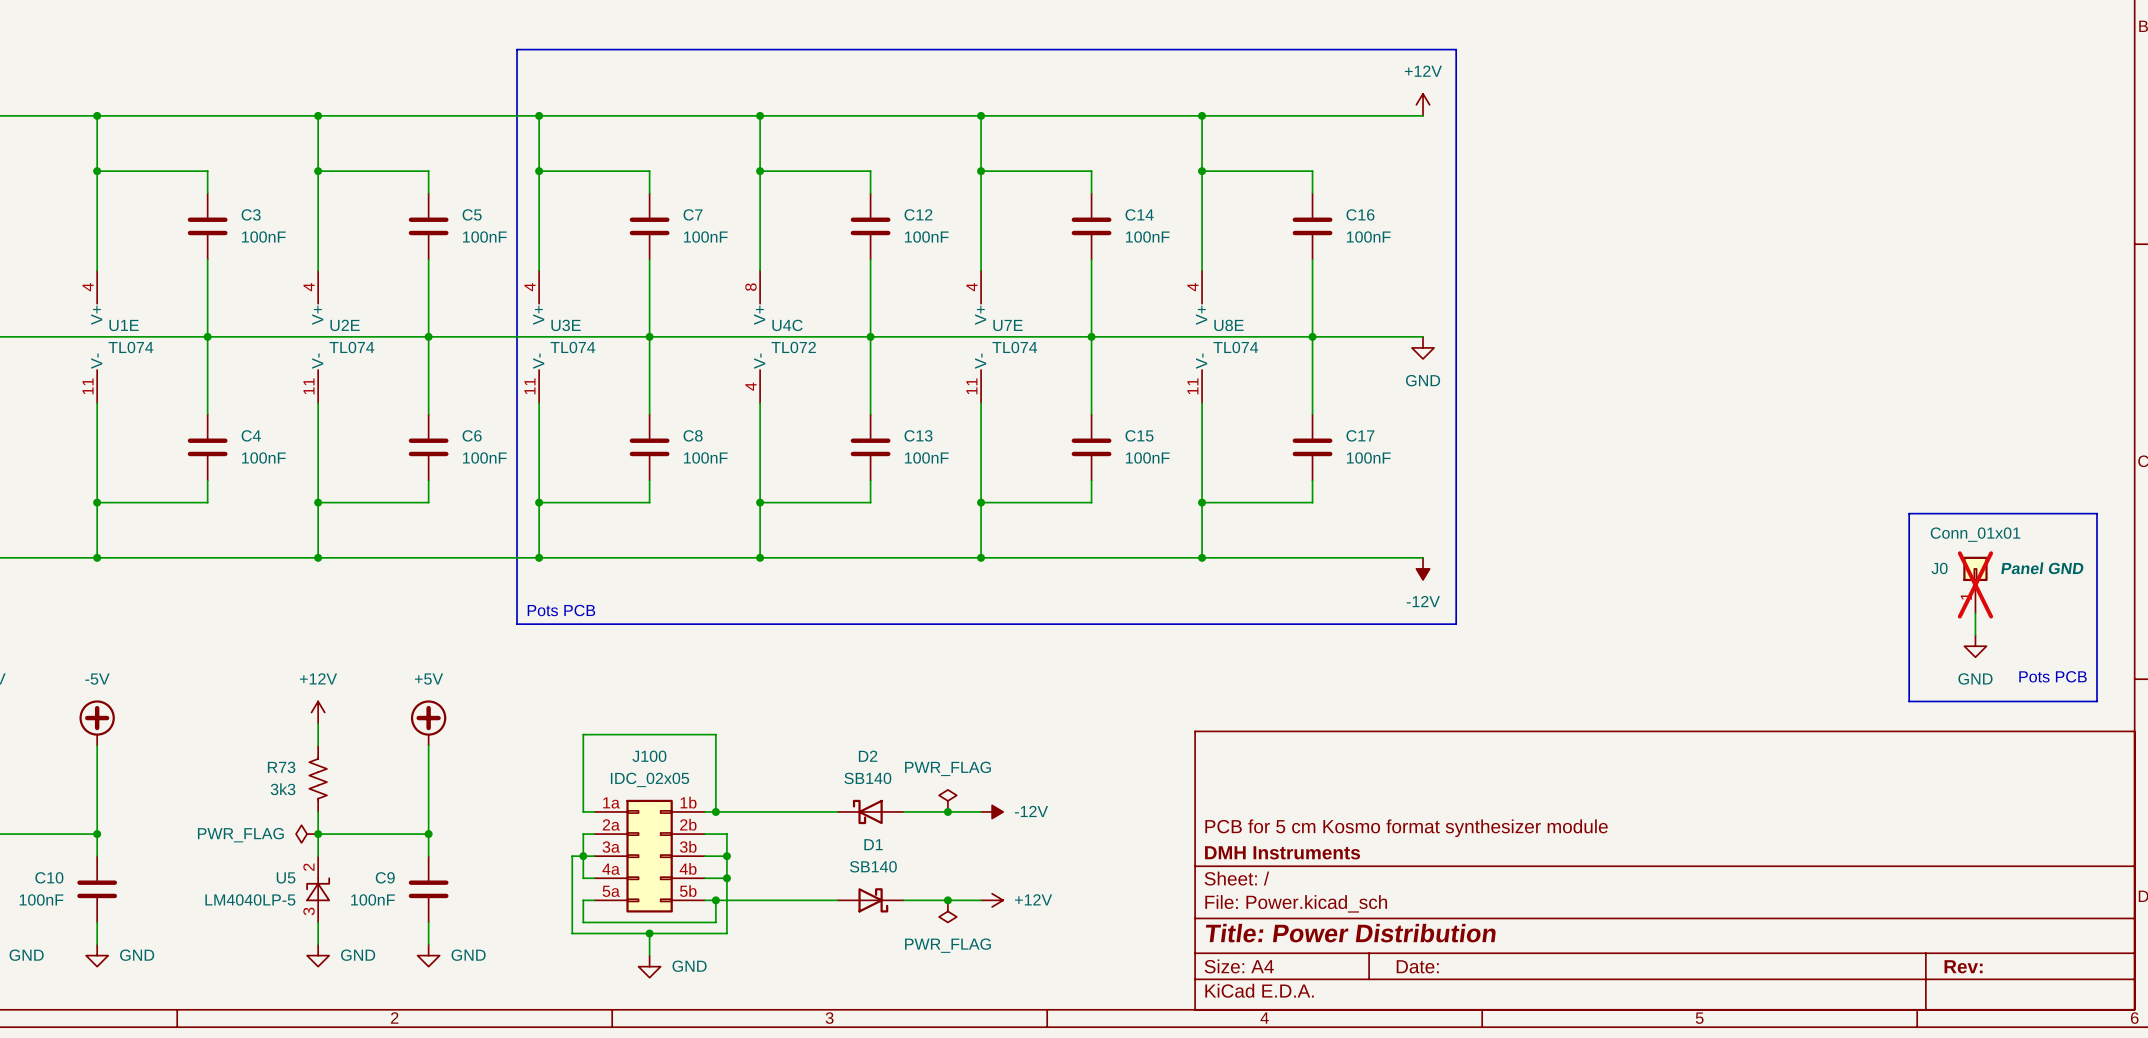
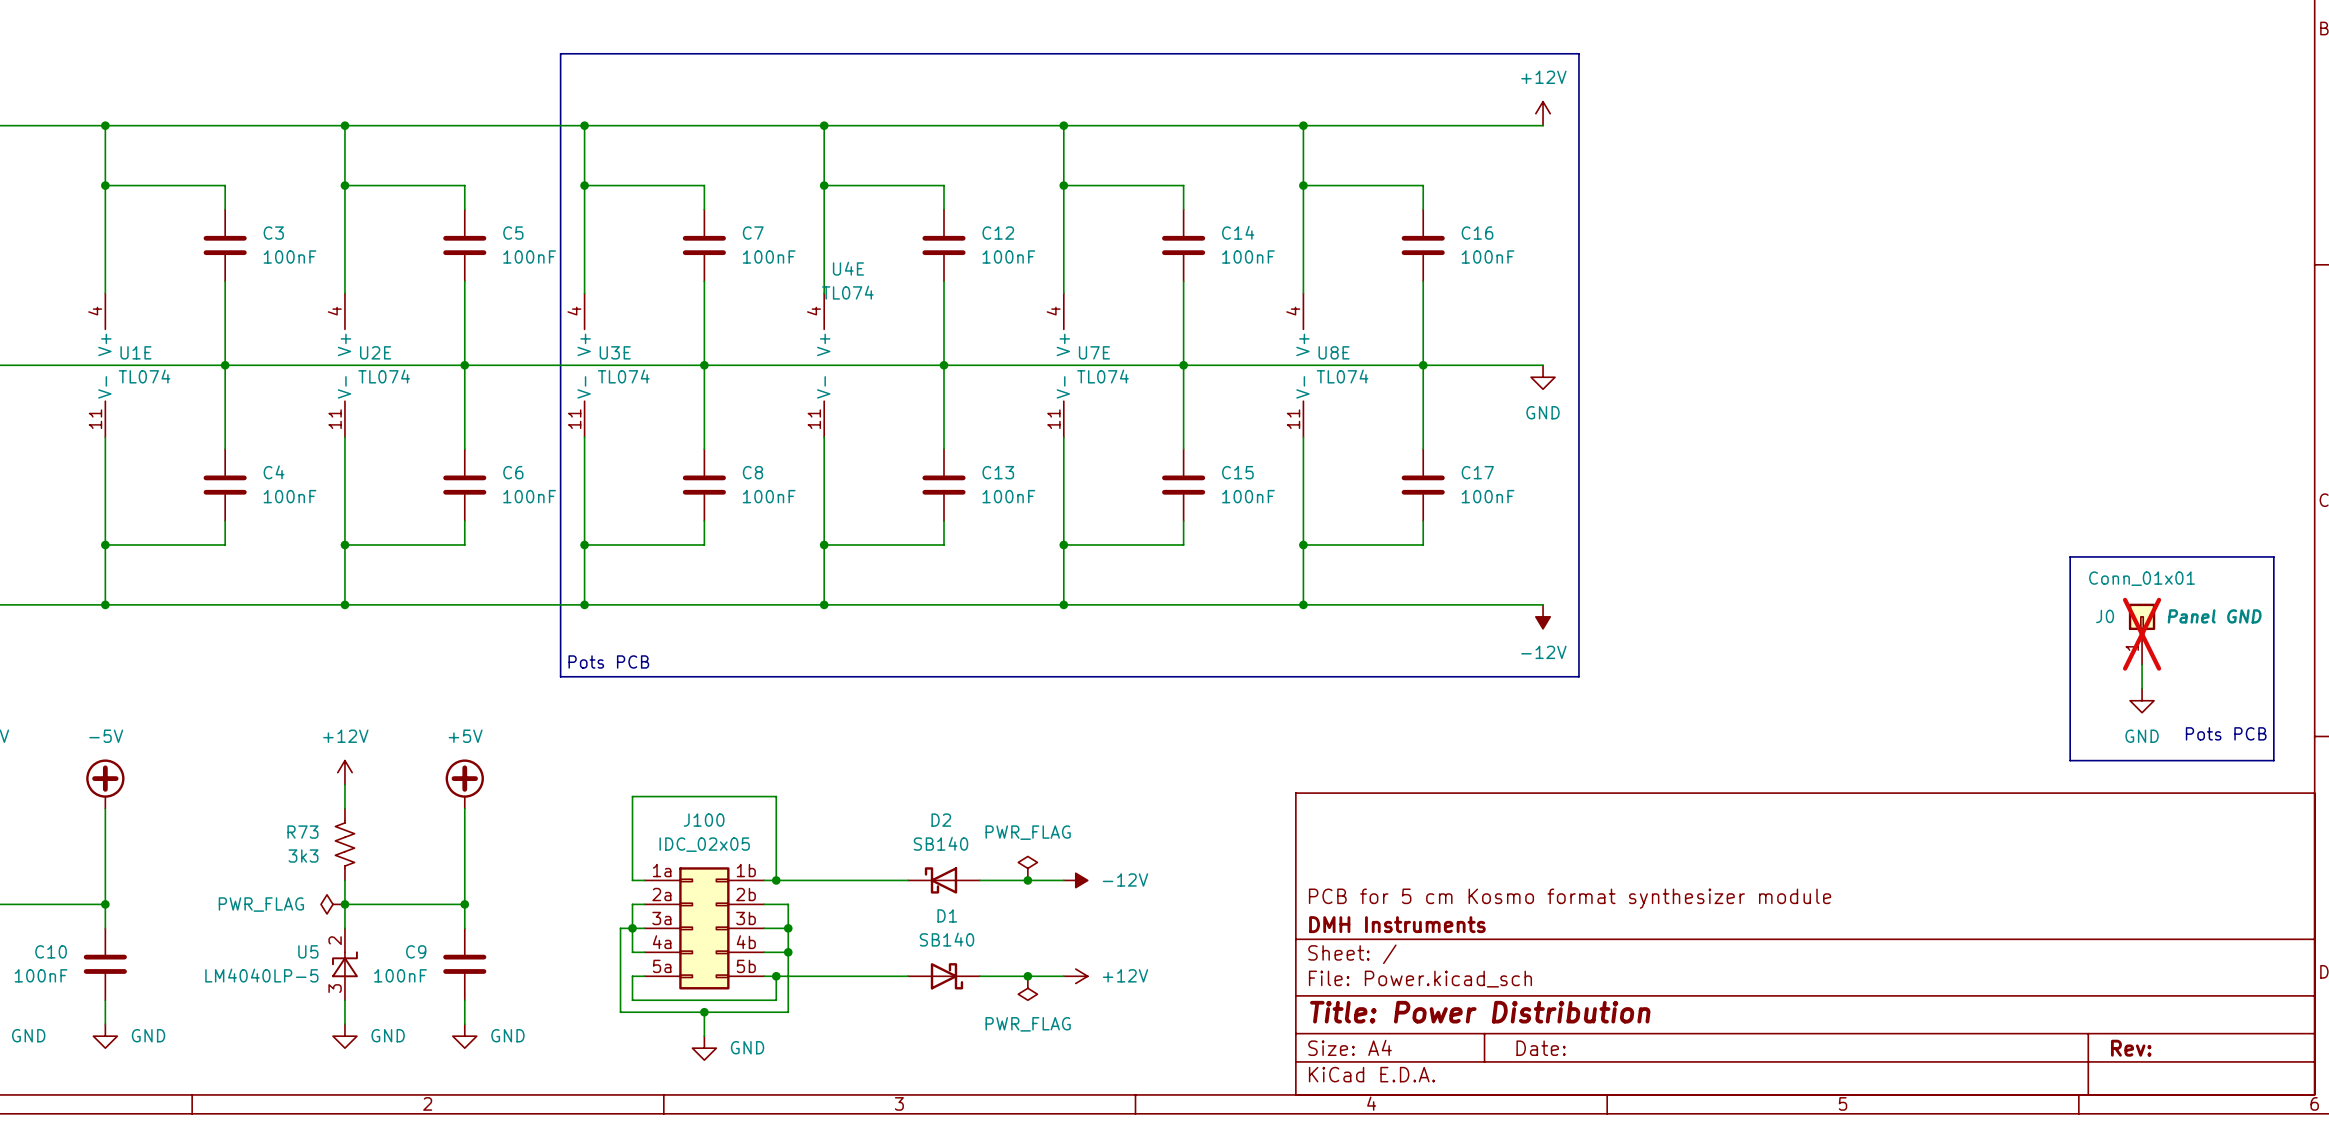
U4C pin number: 8 (750, 287) -> 4 (814, 311)
U4C name: U4C (787, 325) -> U4E (848, 268)
U4C value: TL072 (793, 347) -> TL074 (847, 292)
U4C pin number: 4 (750, 386) -> 11 (814, 419)

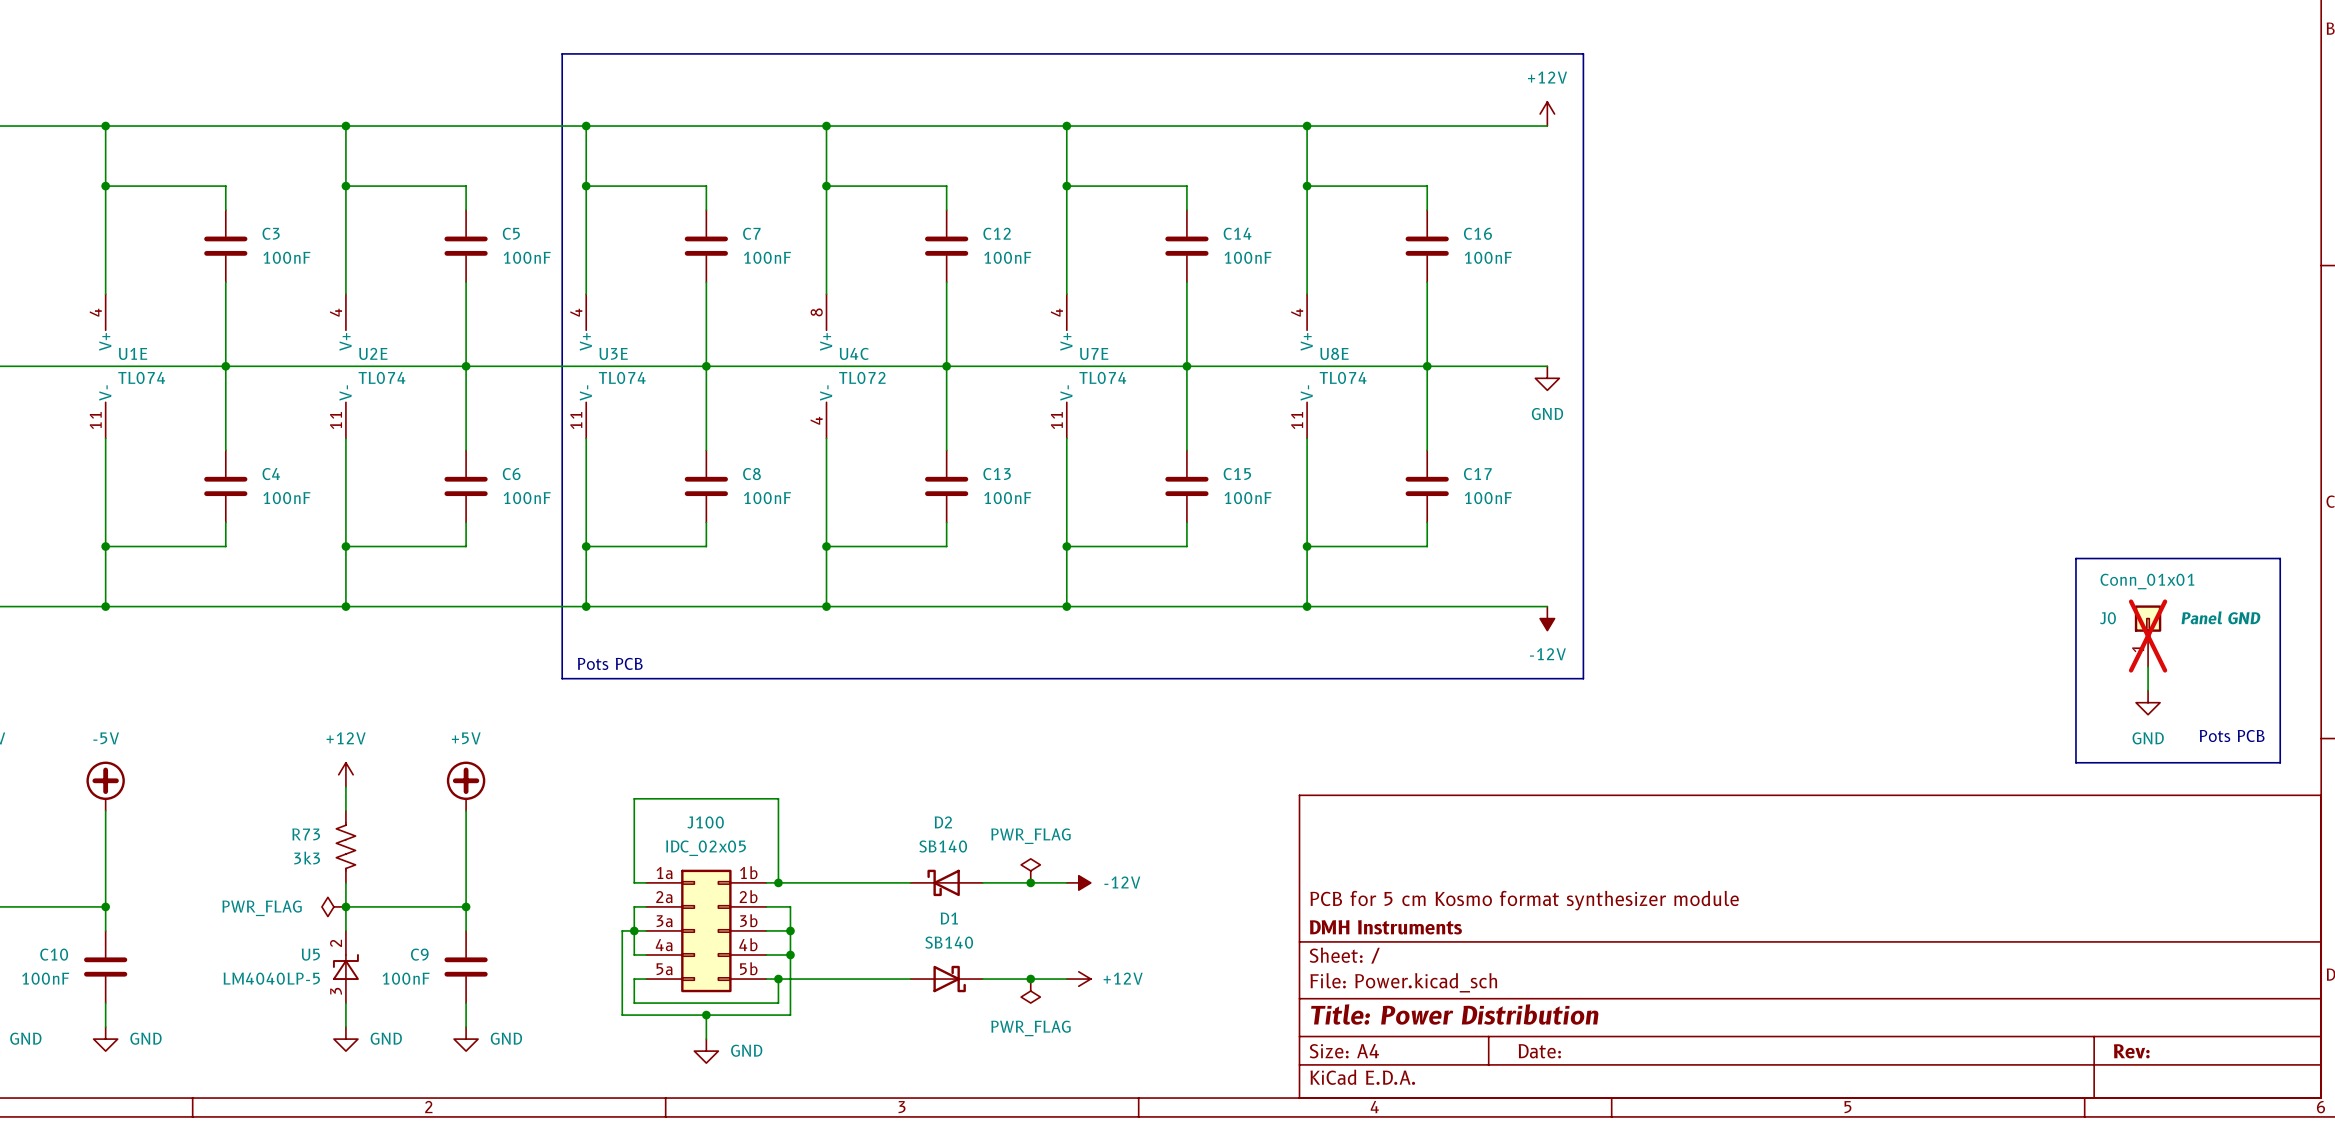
U4E name: U4E (848, 268) -> U4C (854, 353)
U4E value: TL074 (847, 292) -> TL072 (862, 377)
U4E pin number: 4 (814, 311) -> 8 (816, 312)
U4E pin number: 11 (814, 419) -> 4 (816, 420)

